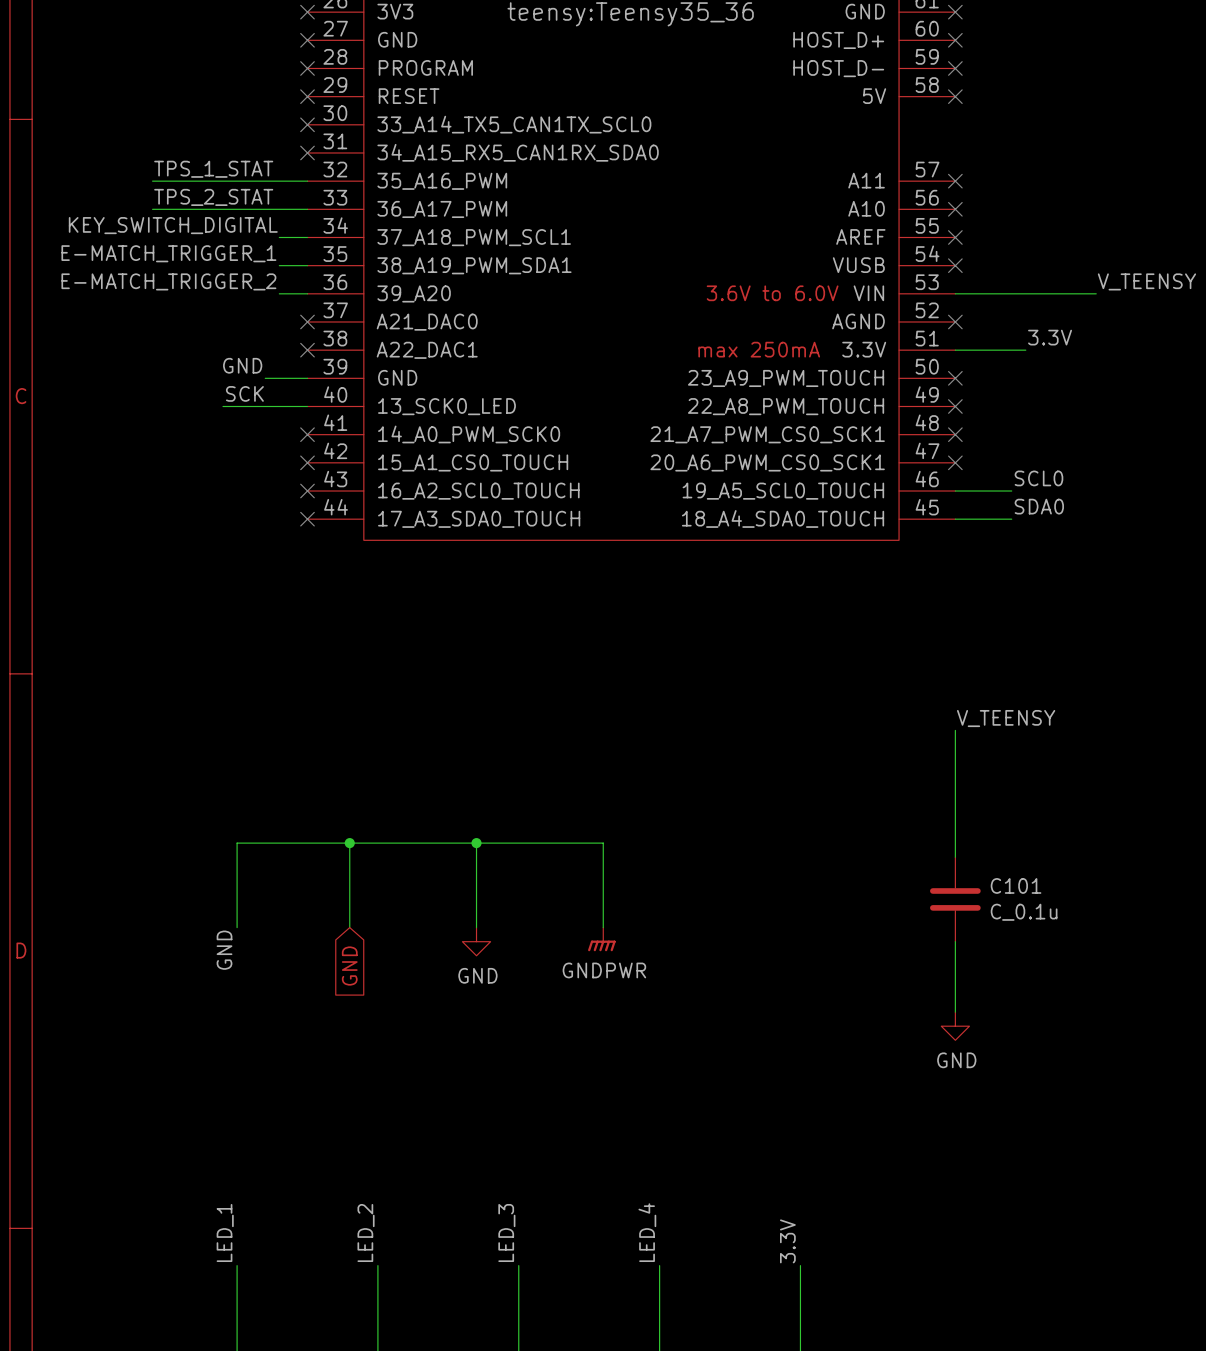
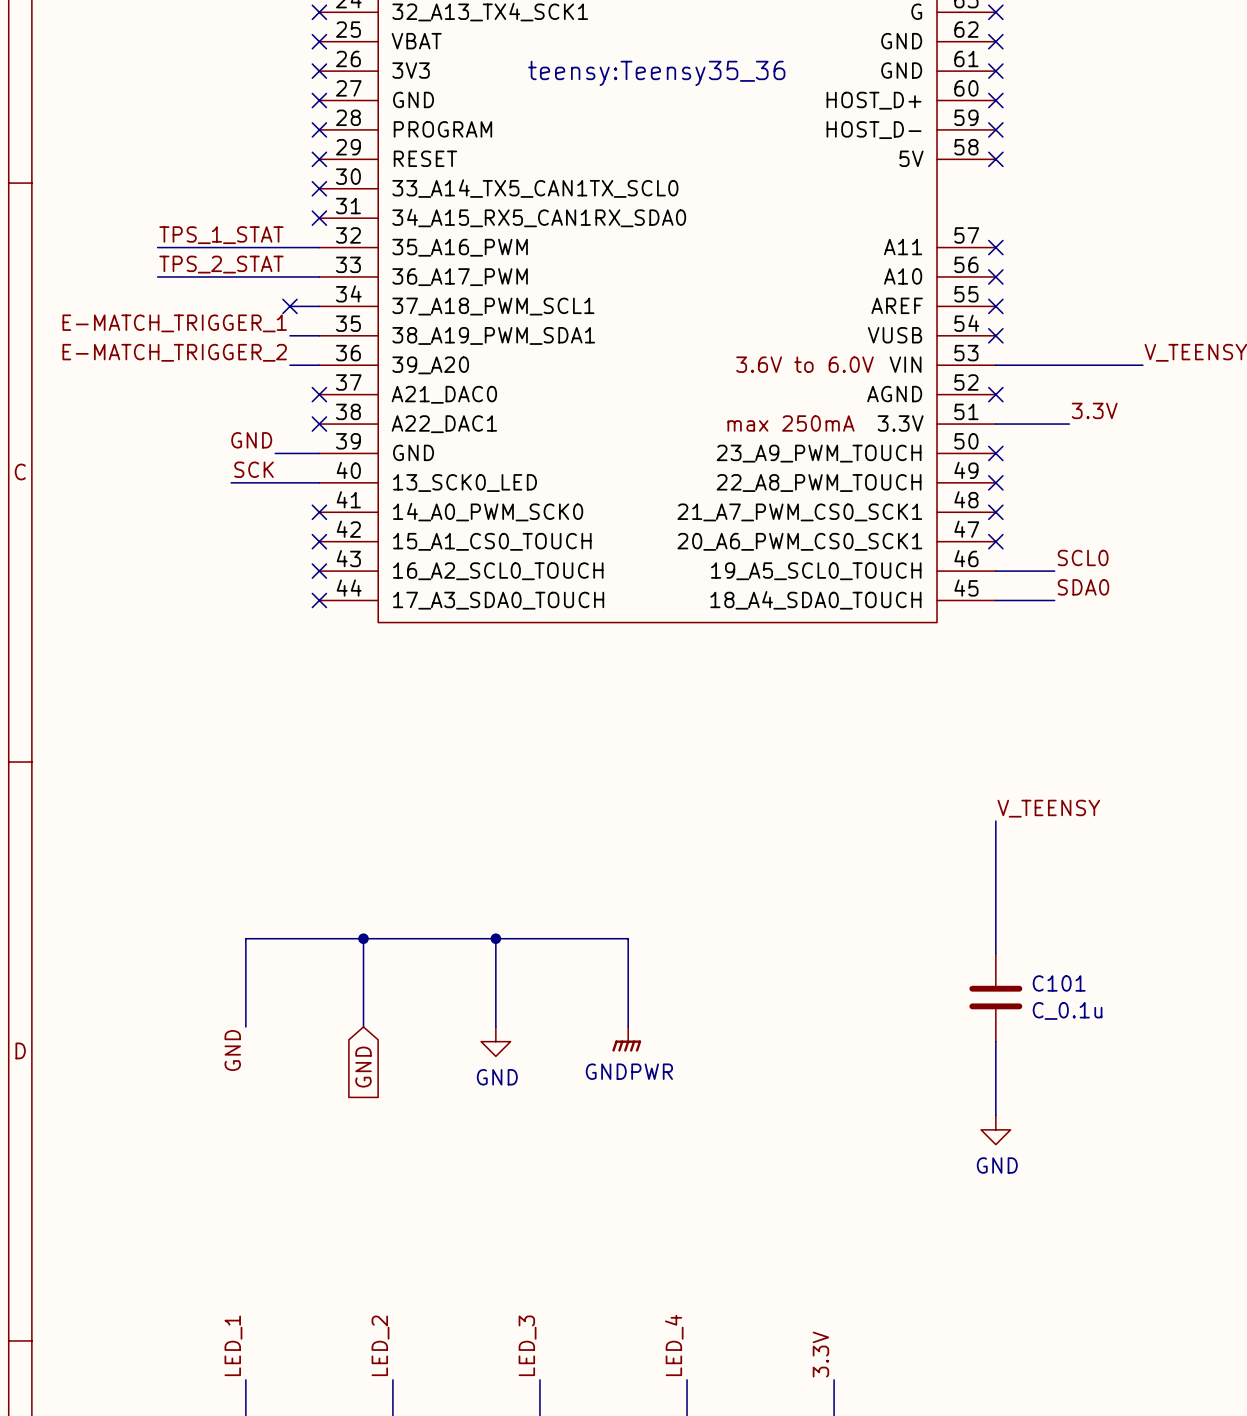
label: KEY_SWITCH_DIGITAL (173, 225) -> none
no-connect mark: none -> (289, 306)

